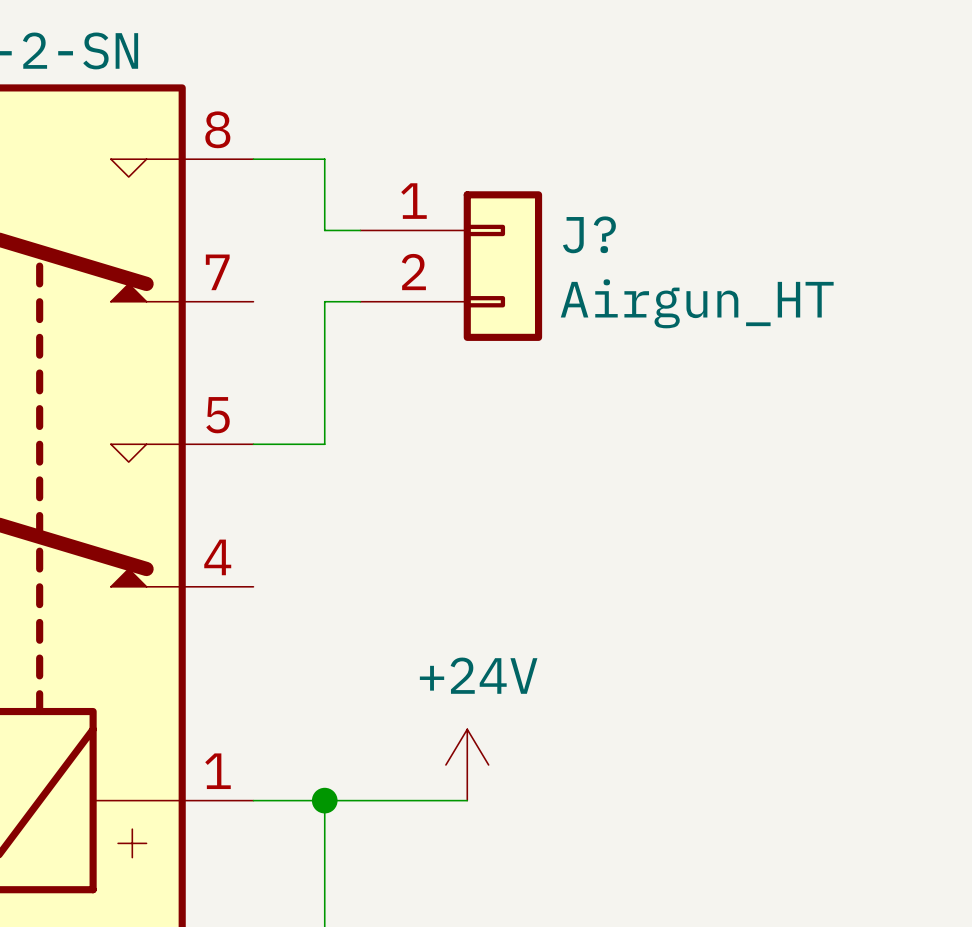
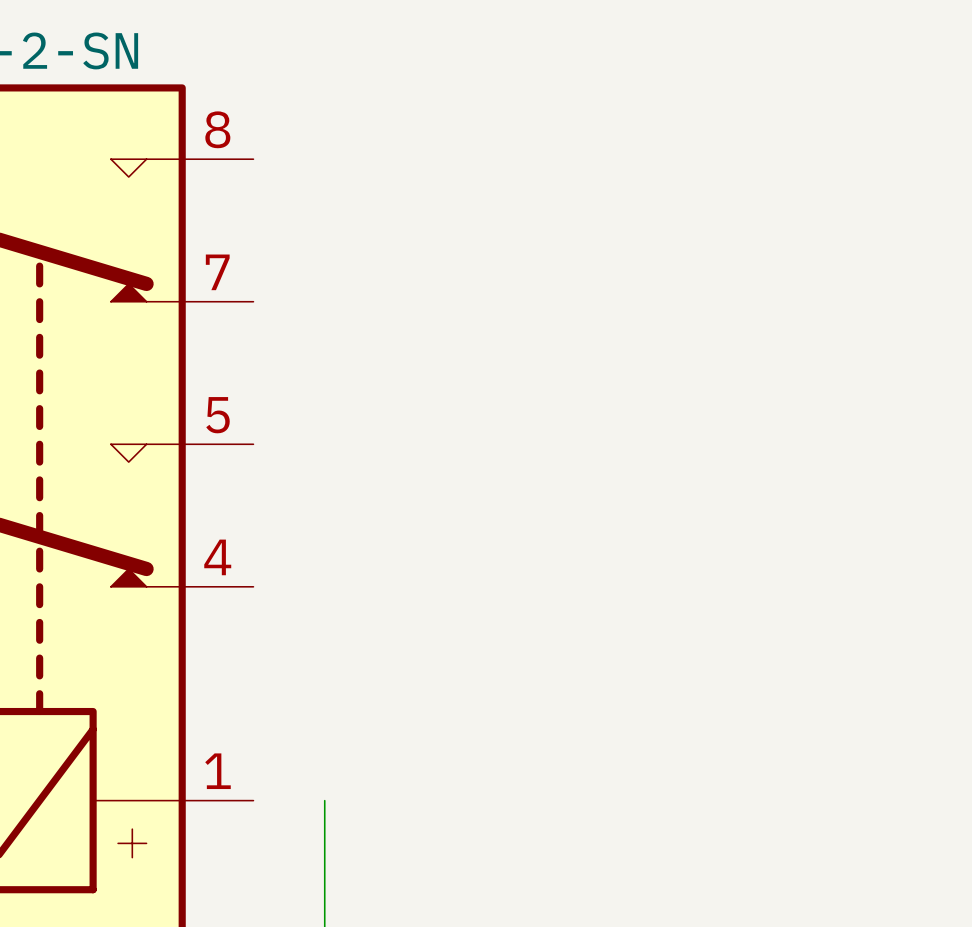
wire: (253, 159) (324, 159) (324, 230) (360, 230) -> none
J?: Airgun_HT (451, 266) -> none
wire: (360, 301) (324, 301) (324, 444) (253, 444) -> none
power symbol: +24V (467, 764) -> none
wire: (253, 800) (467, 800) -> none
junction: (324, 800) -> none

